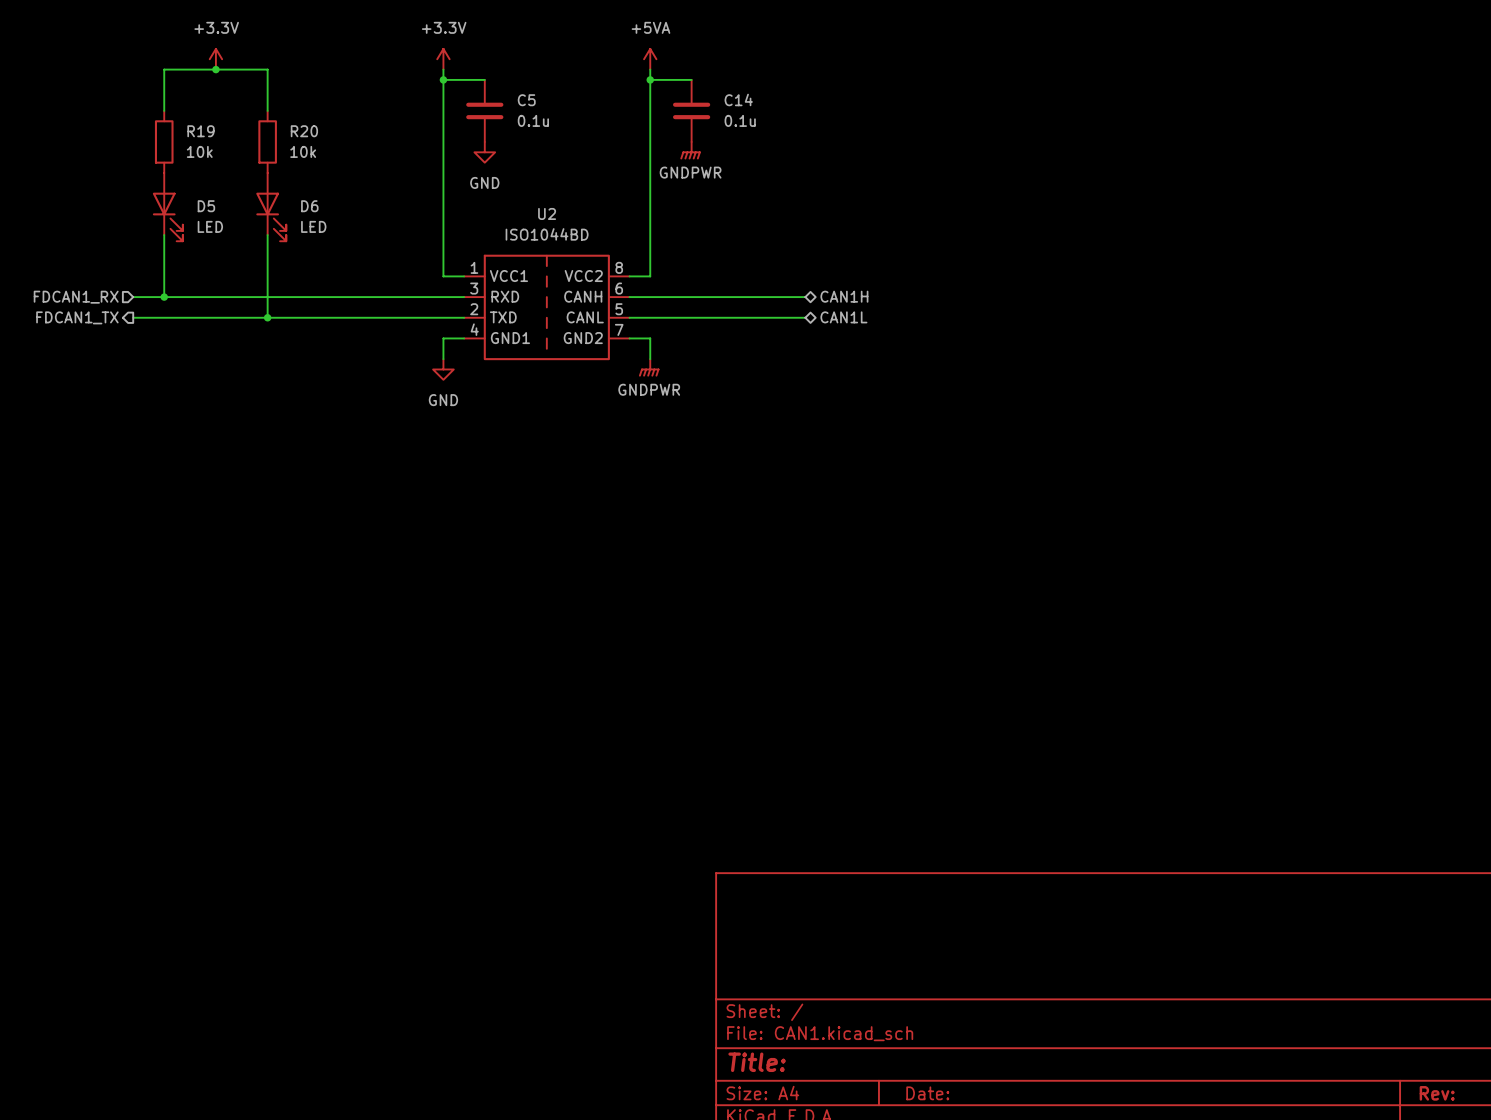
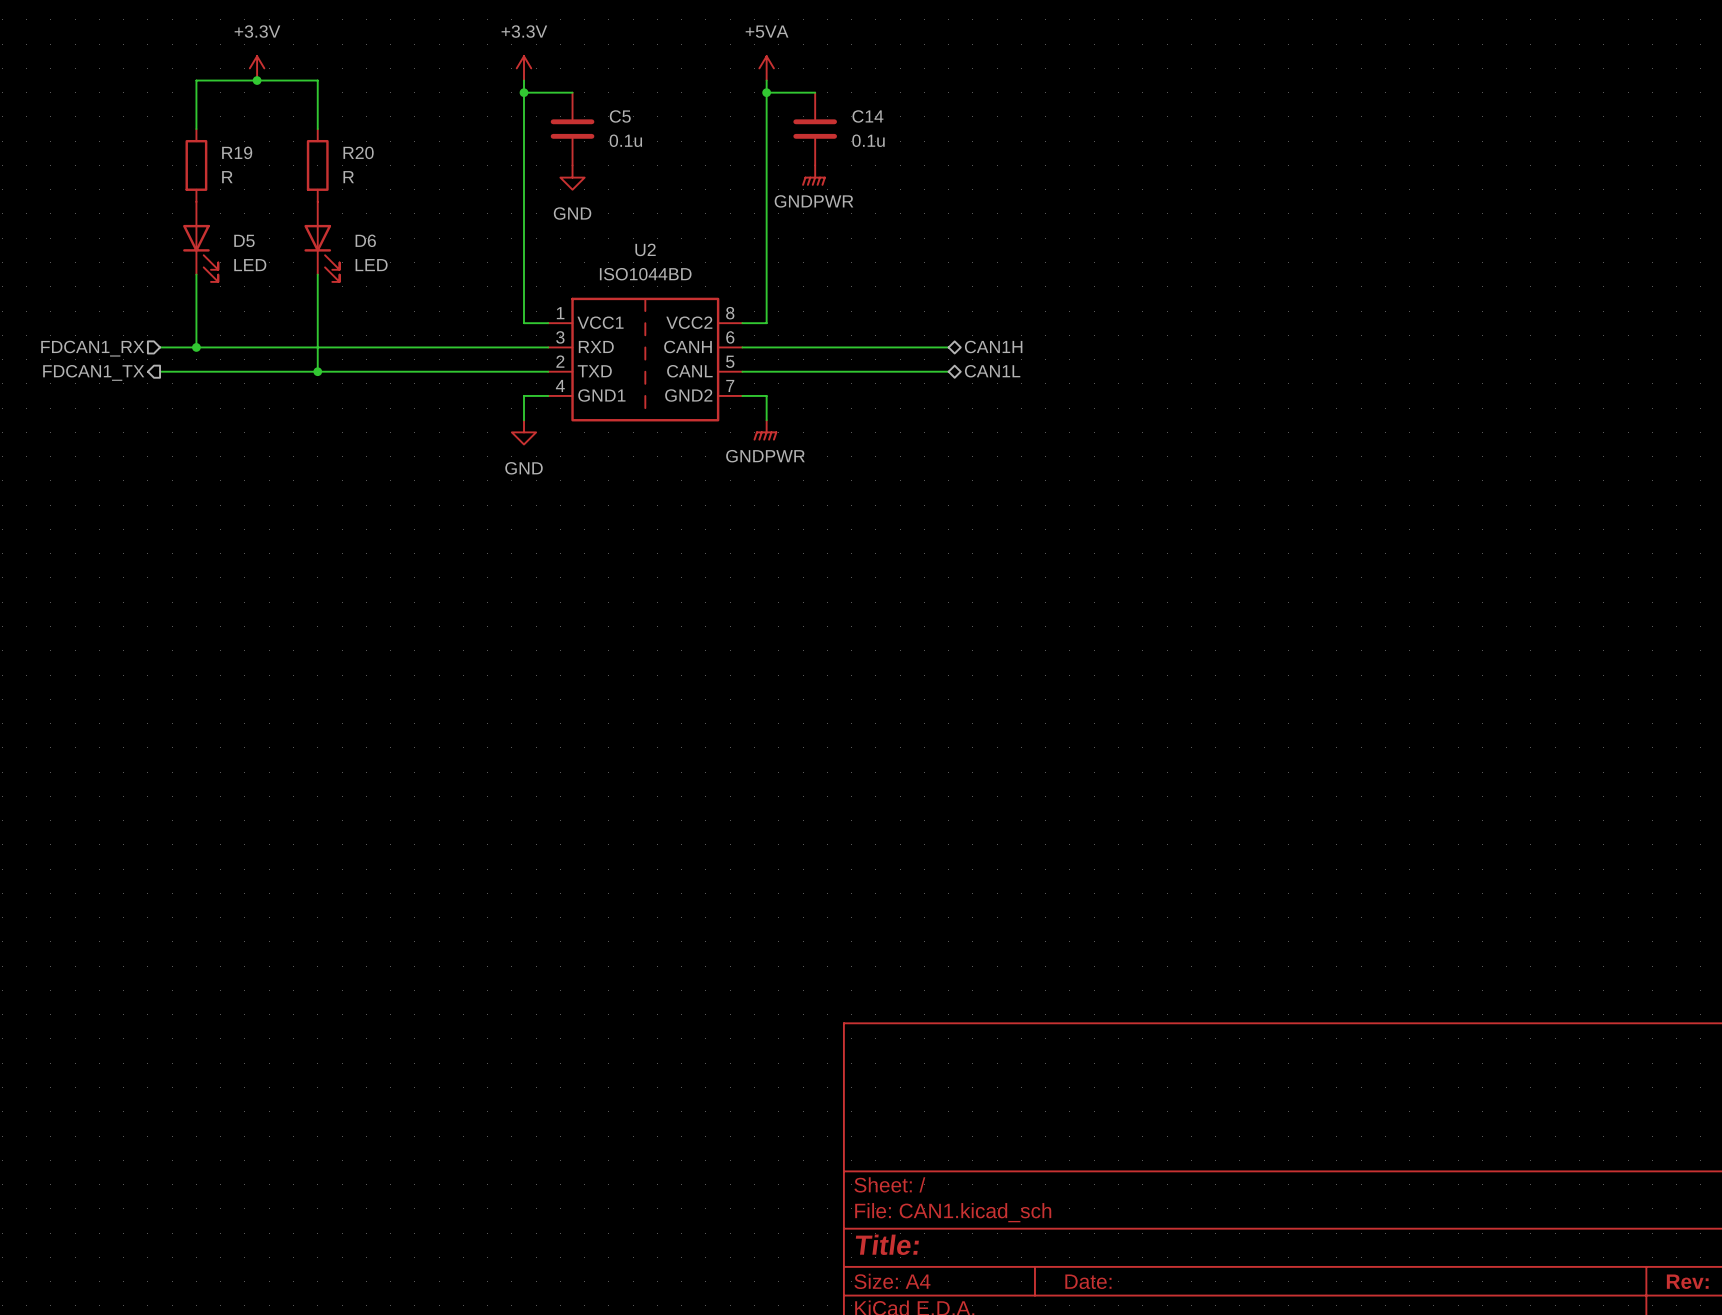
R19 value: 10k (199, 151) -> R (227, 177)
R20 value: 10k (303, 151) -> R (348, 177)

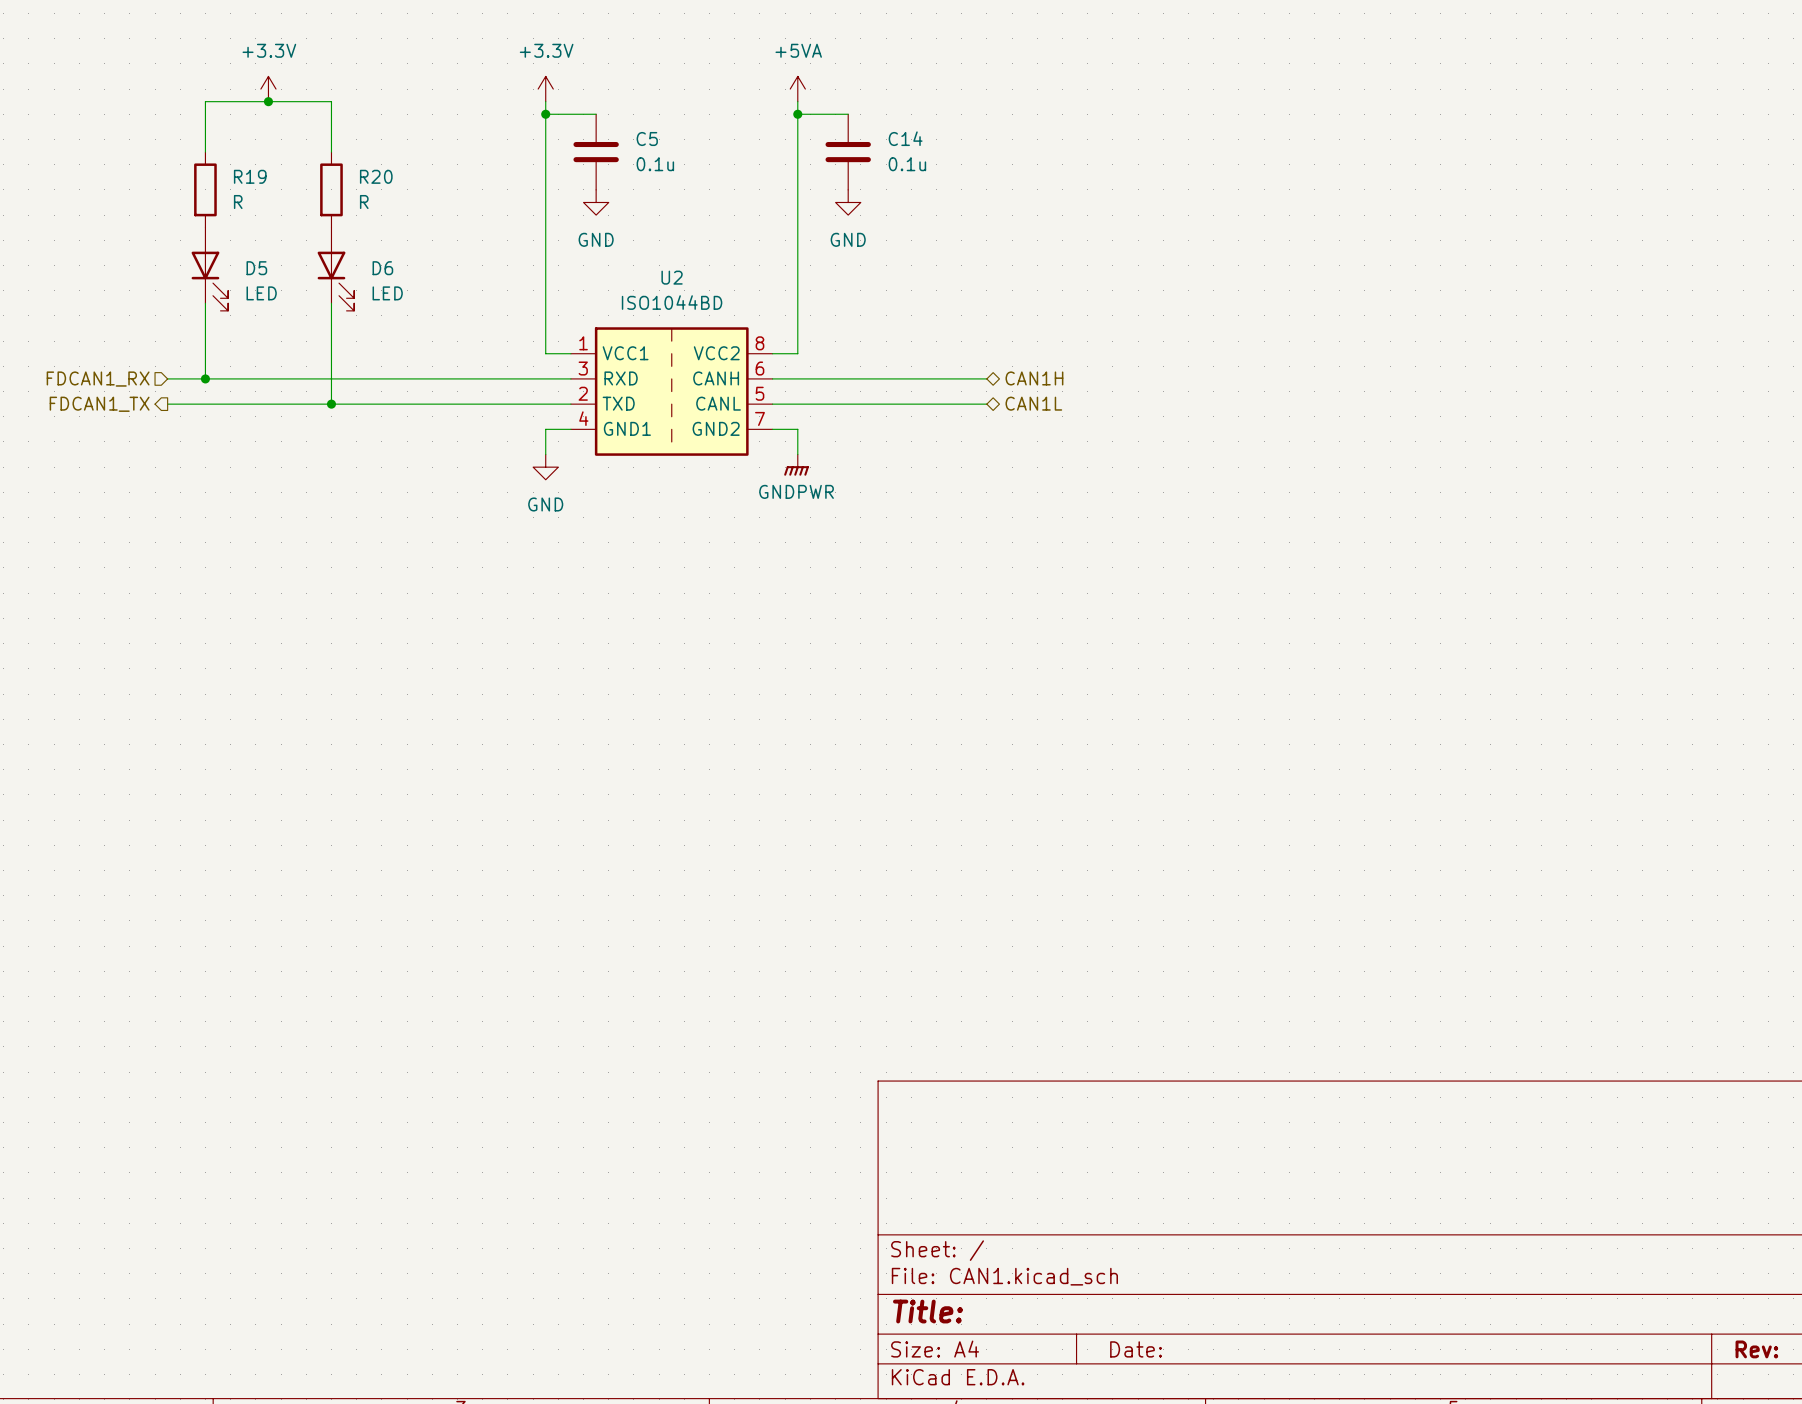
power symbol: GNDPWR (813, 175) -> GND (848, 202)

